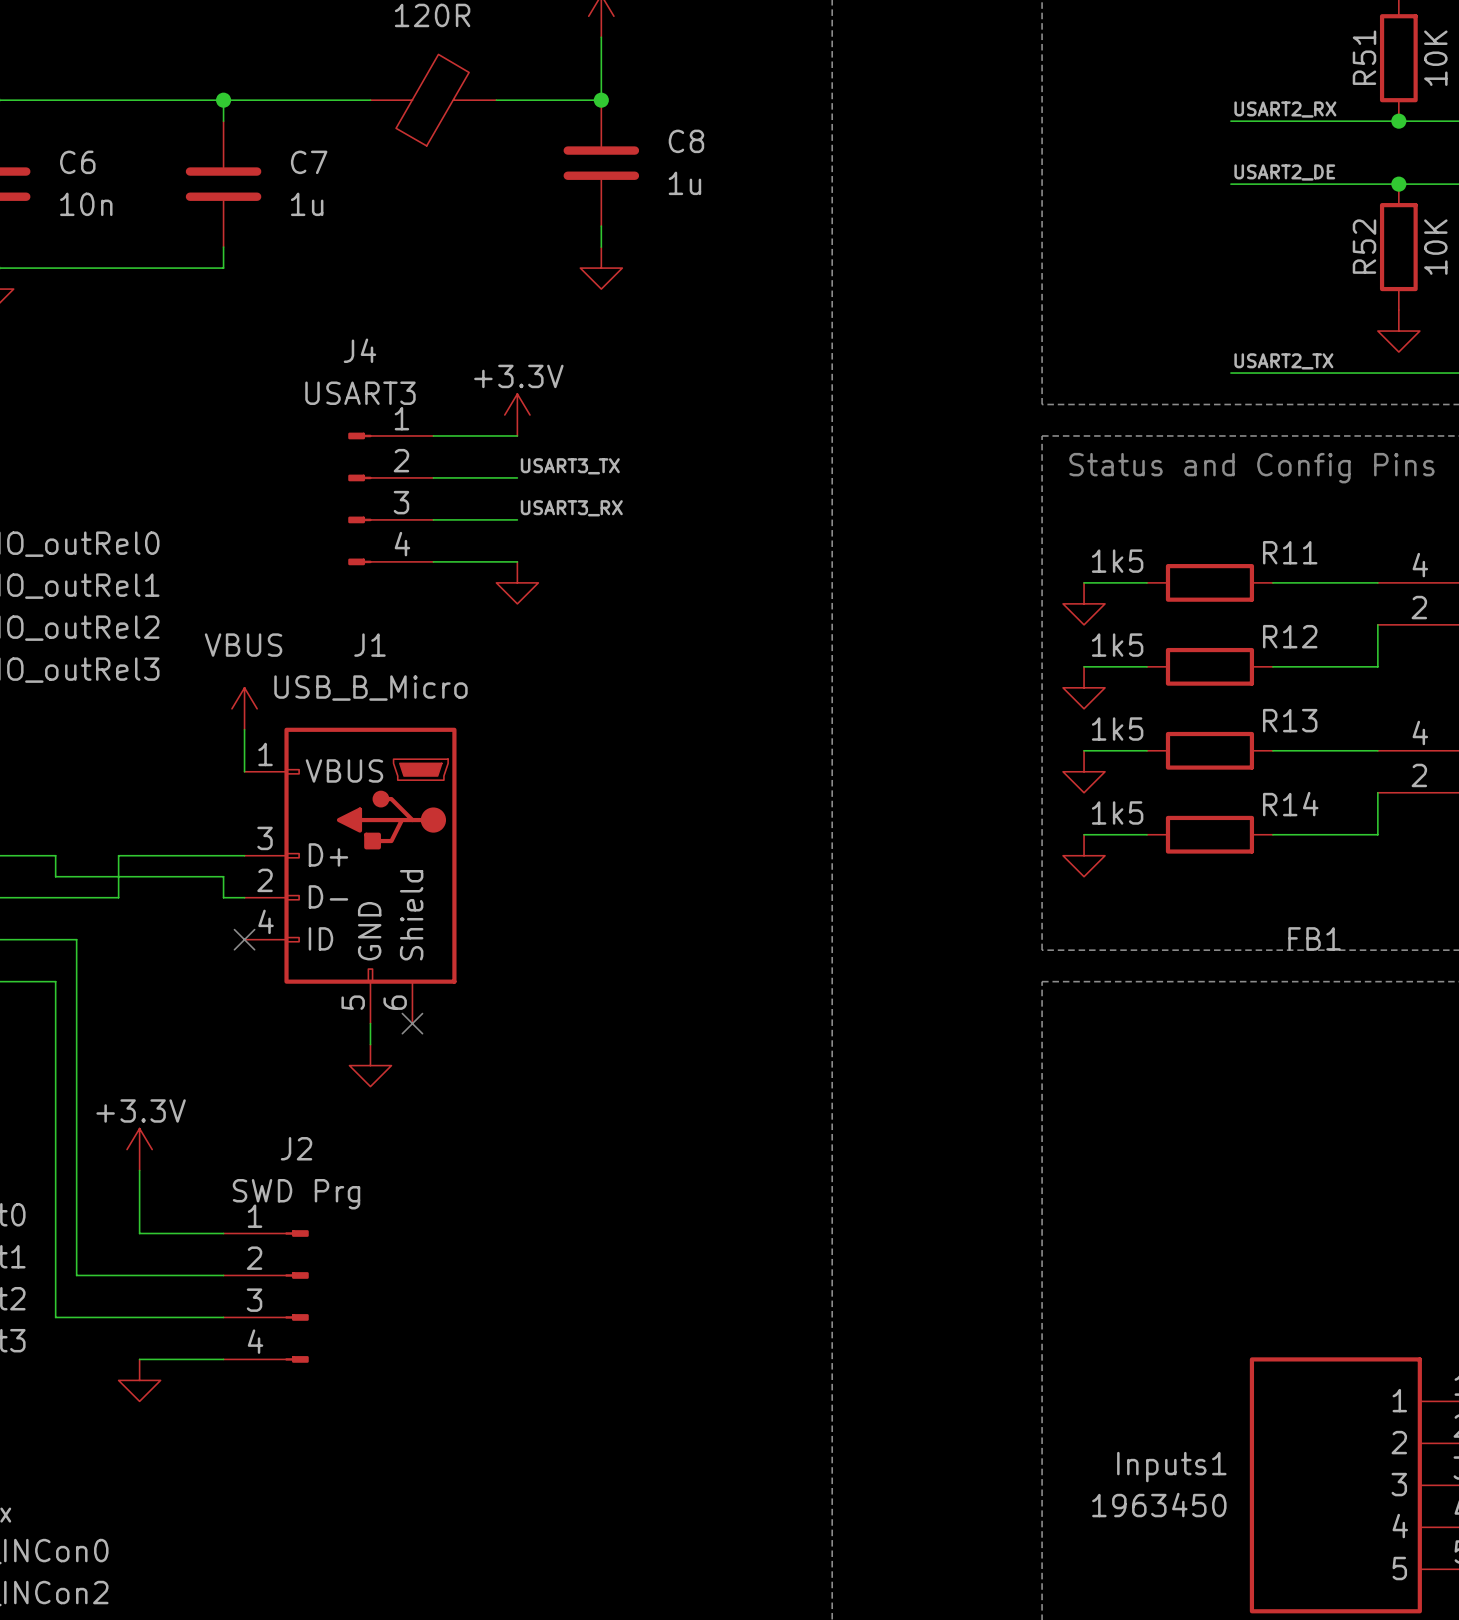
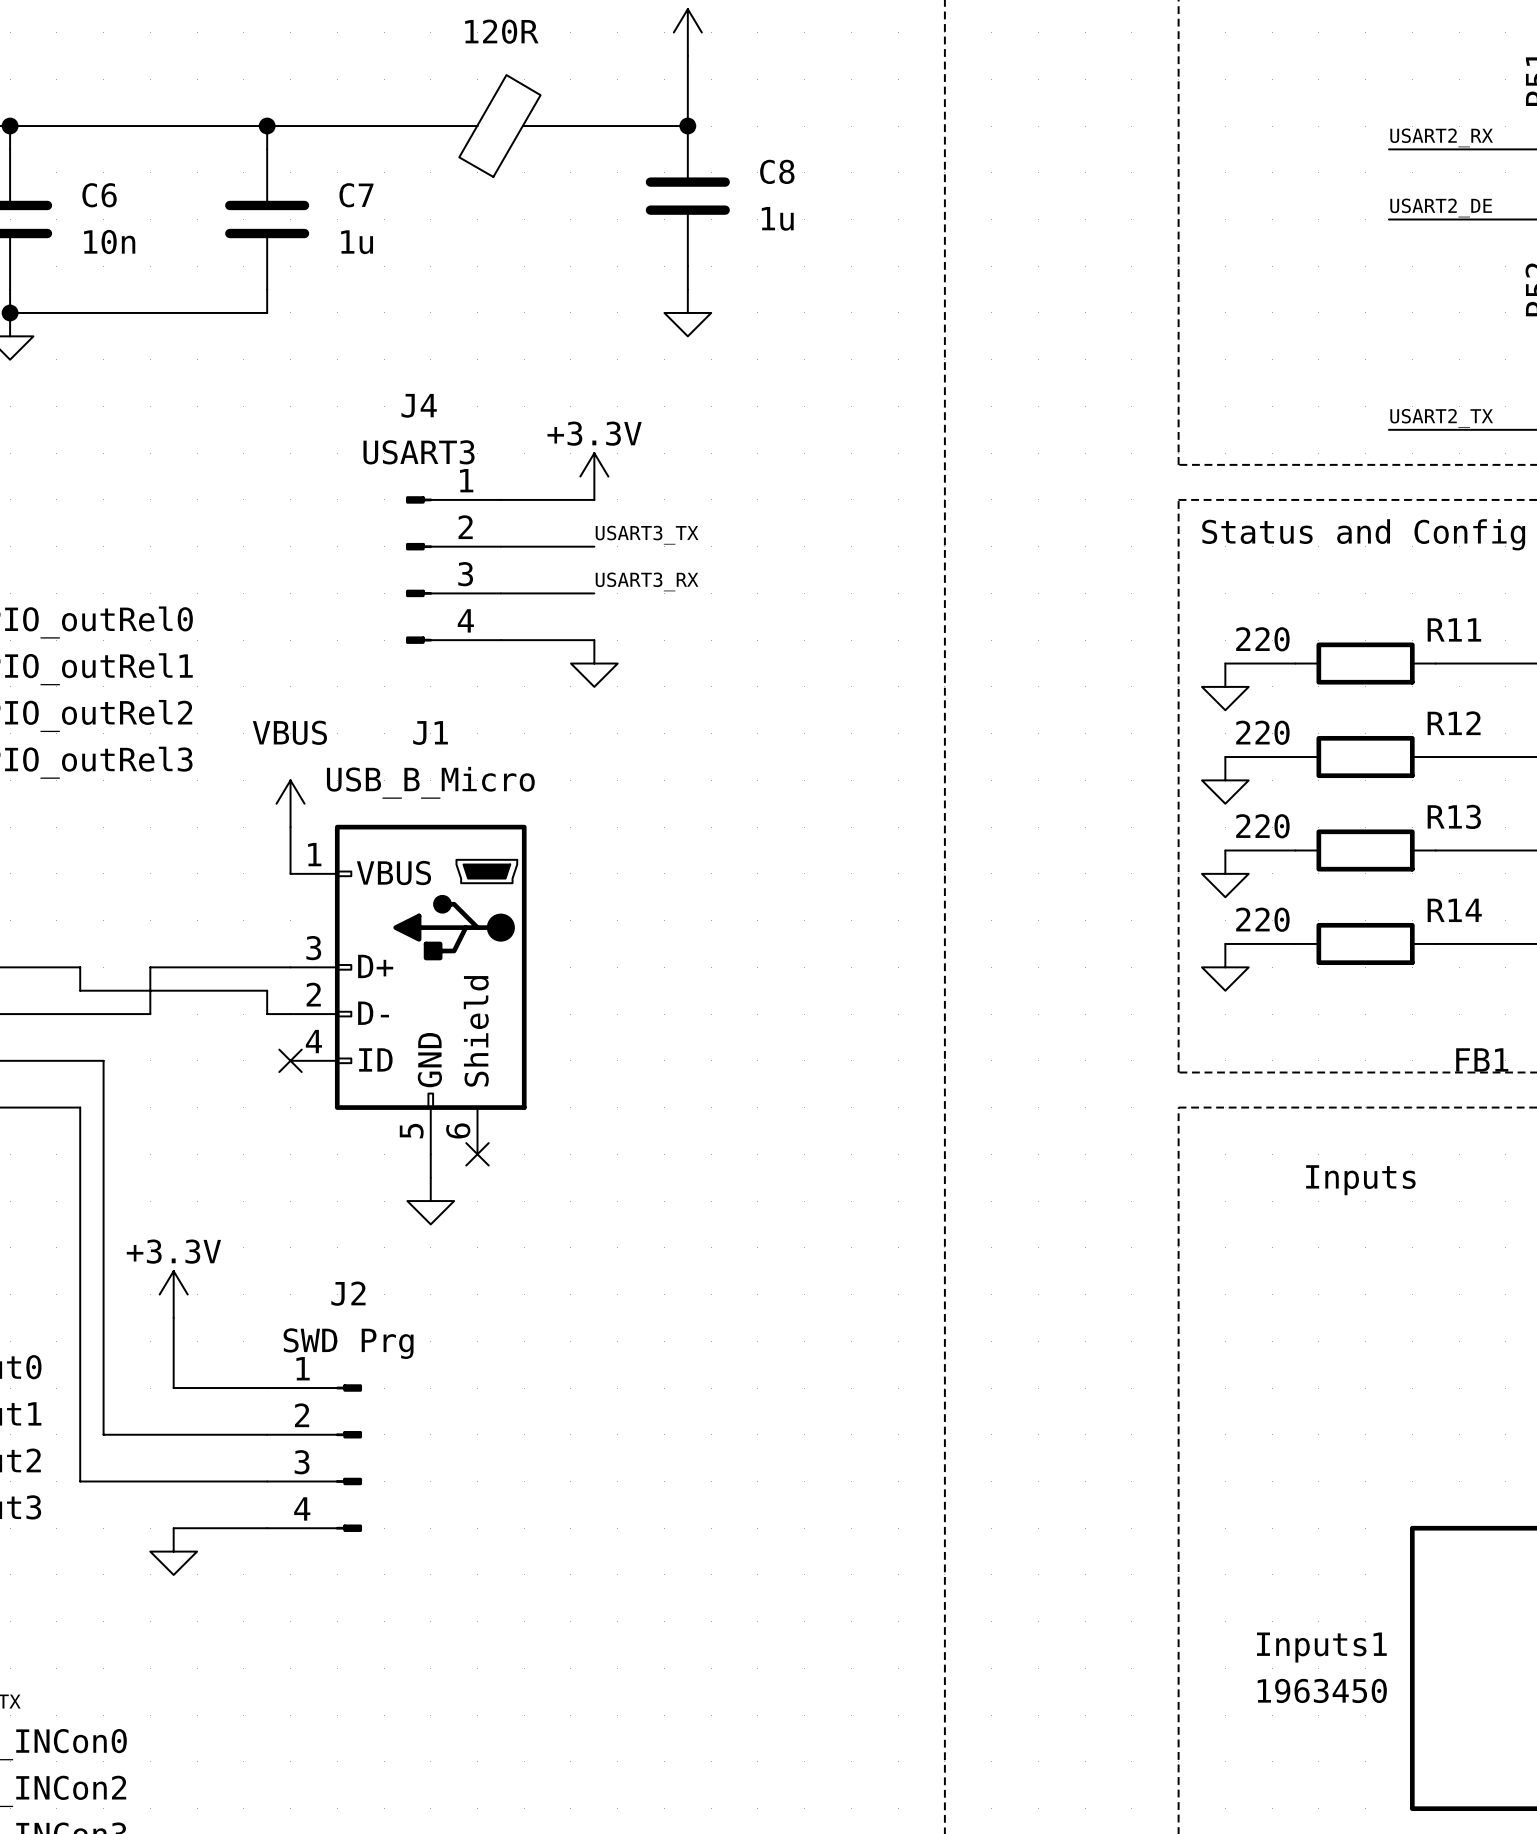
R11 value: 1k5 (1117, 561) -> 220 (1262, 639)
R12 value: 1k5 (1117, 645) -> 220 (1262, 732)
R13 value: 1k5 (1117, 729) -> 220 (1262, 826)
R14 value: 1k5 (1117, 812) -> 220 (1262, 919)
text: none -> Inputs (1360, 1180)

